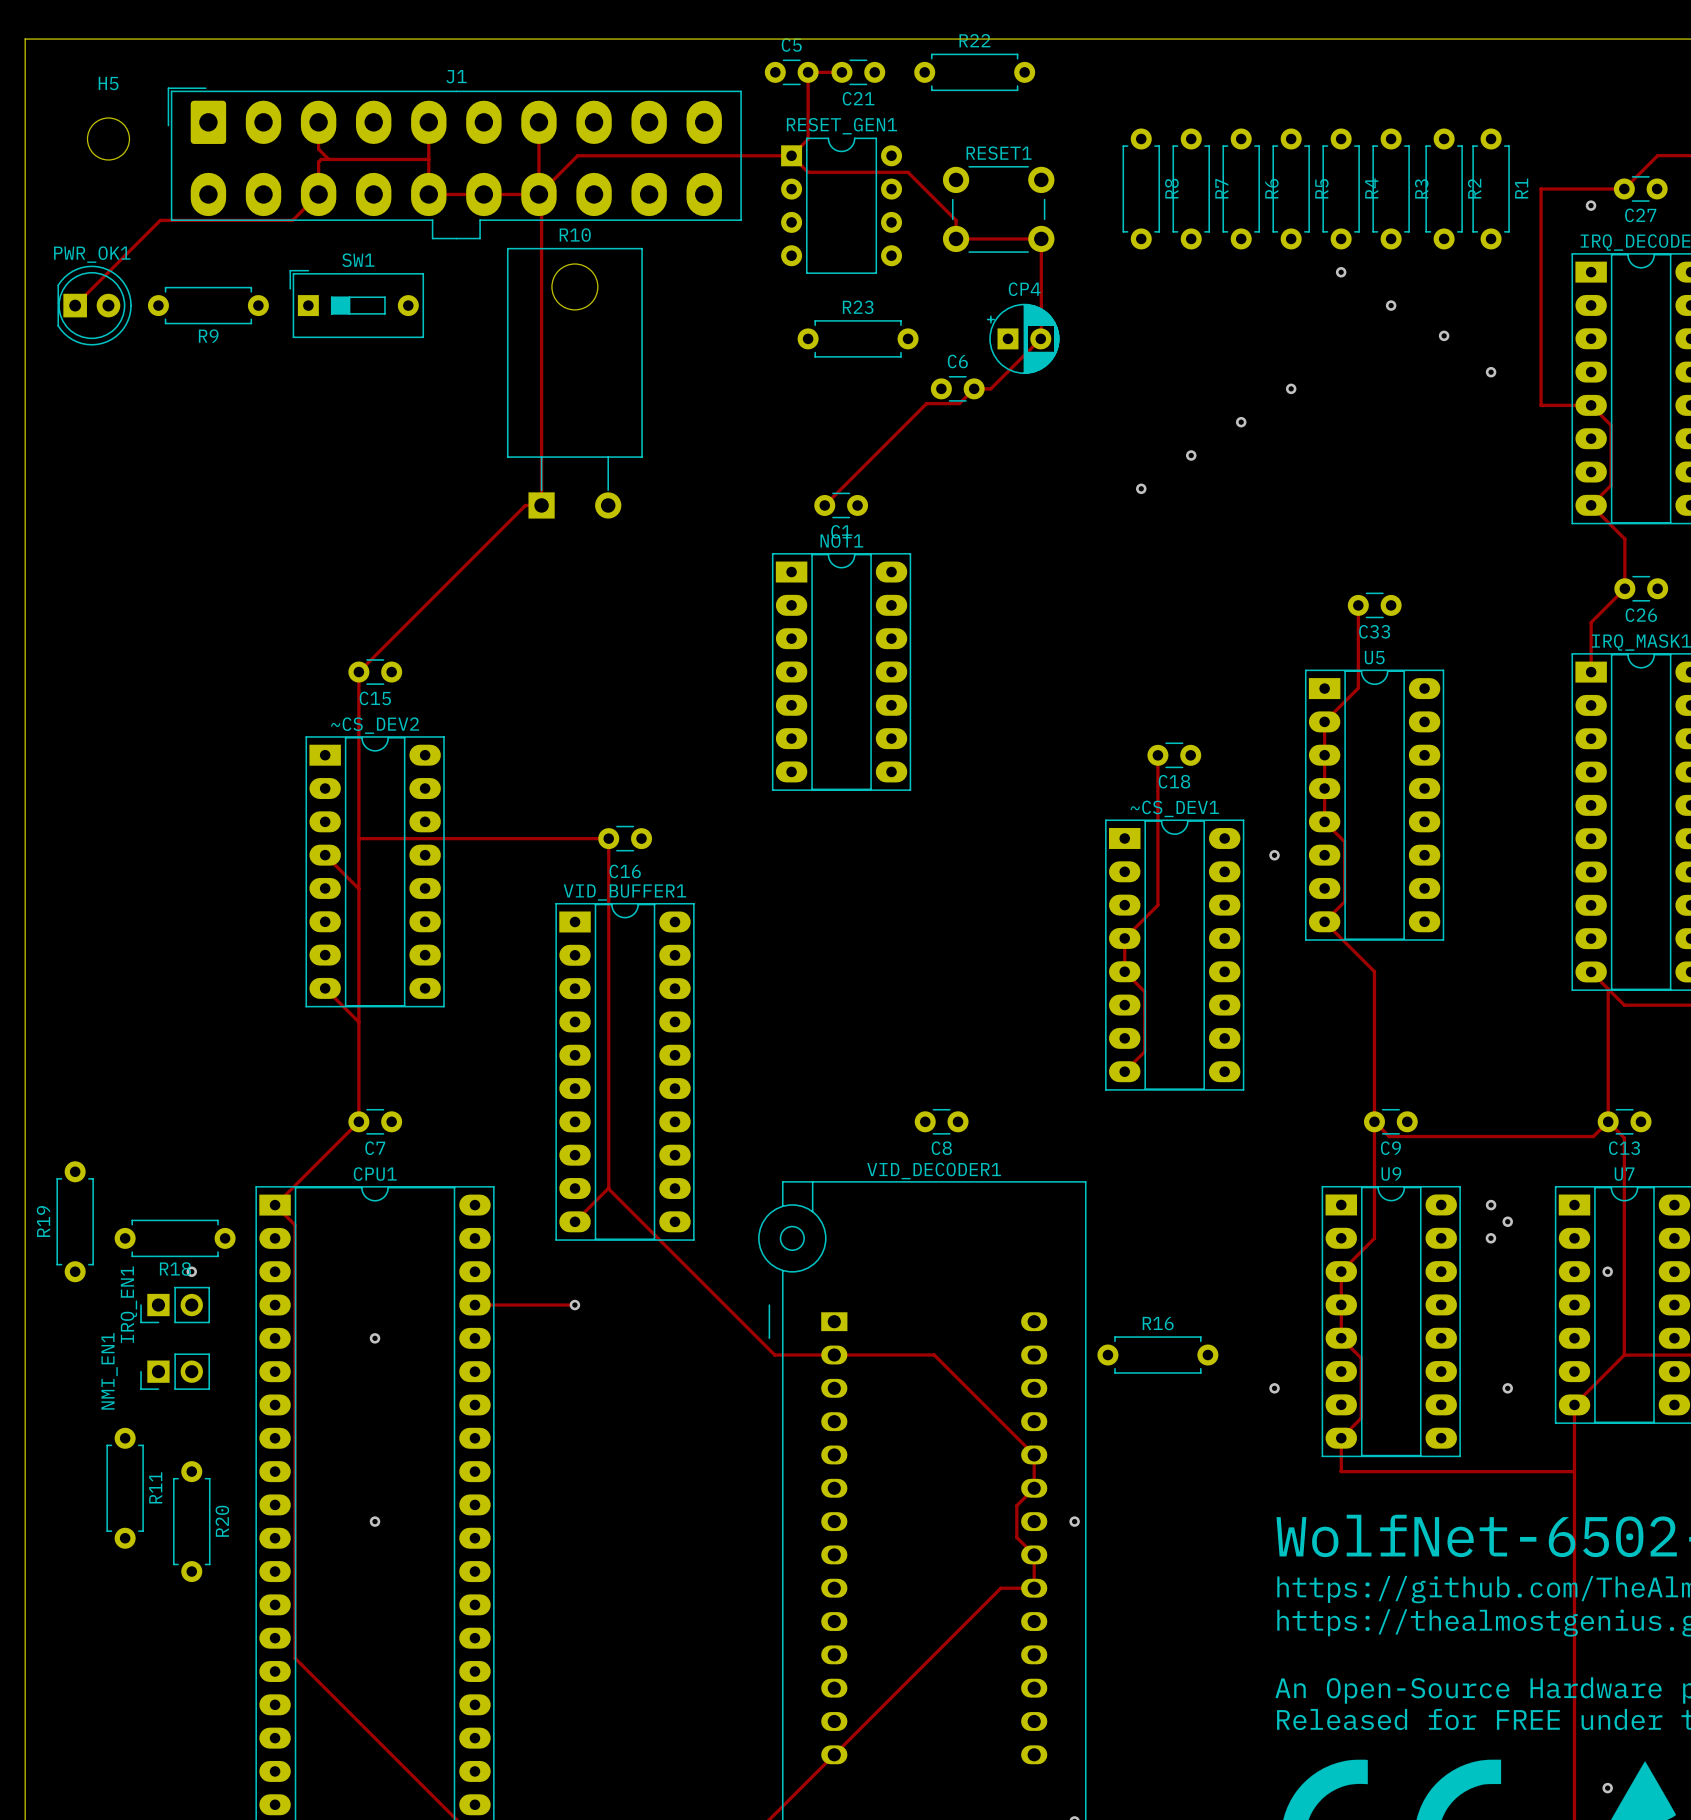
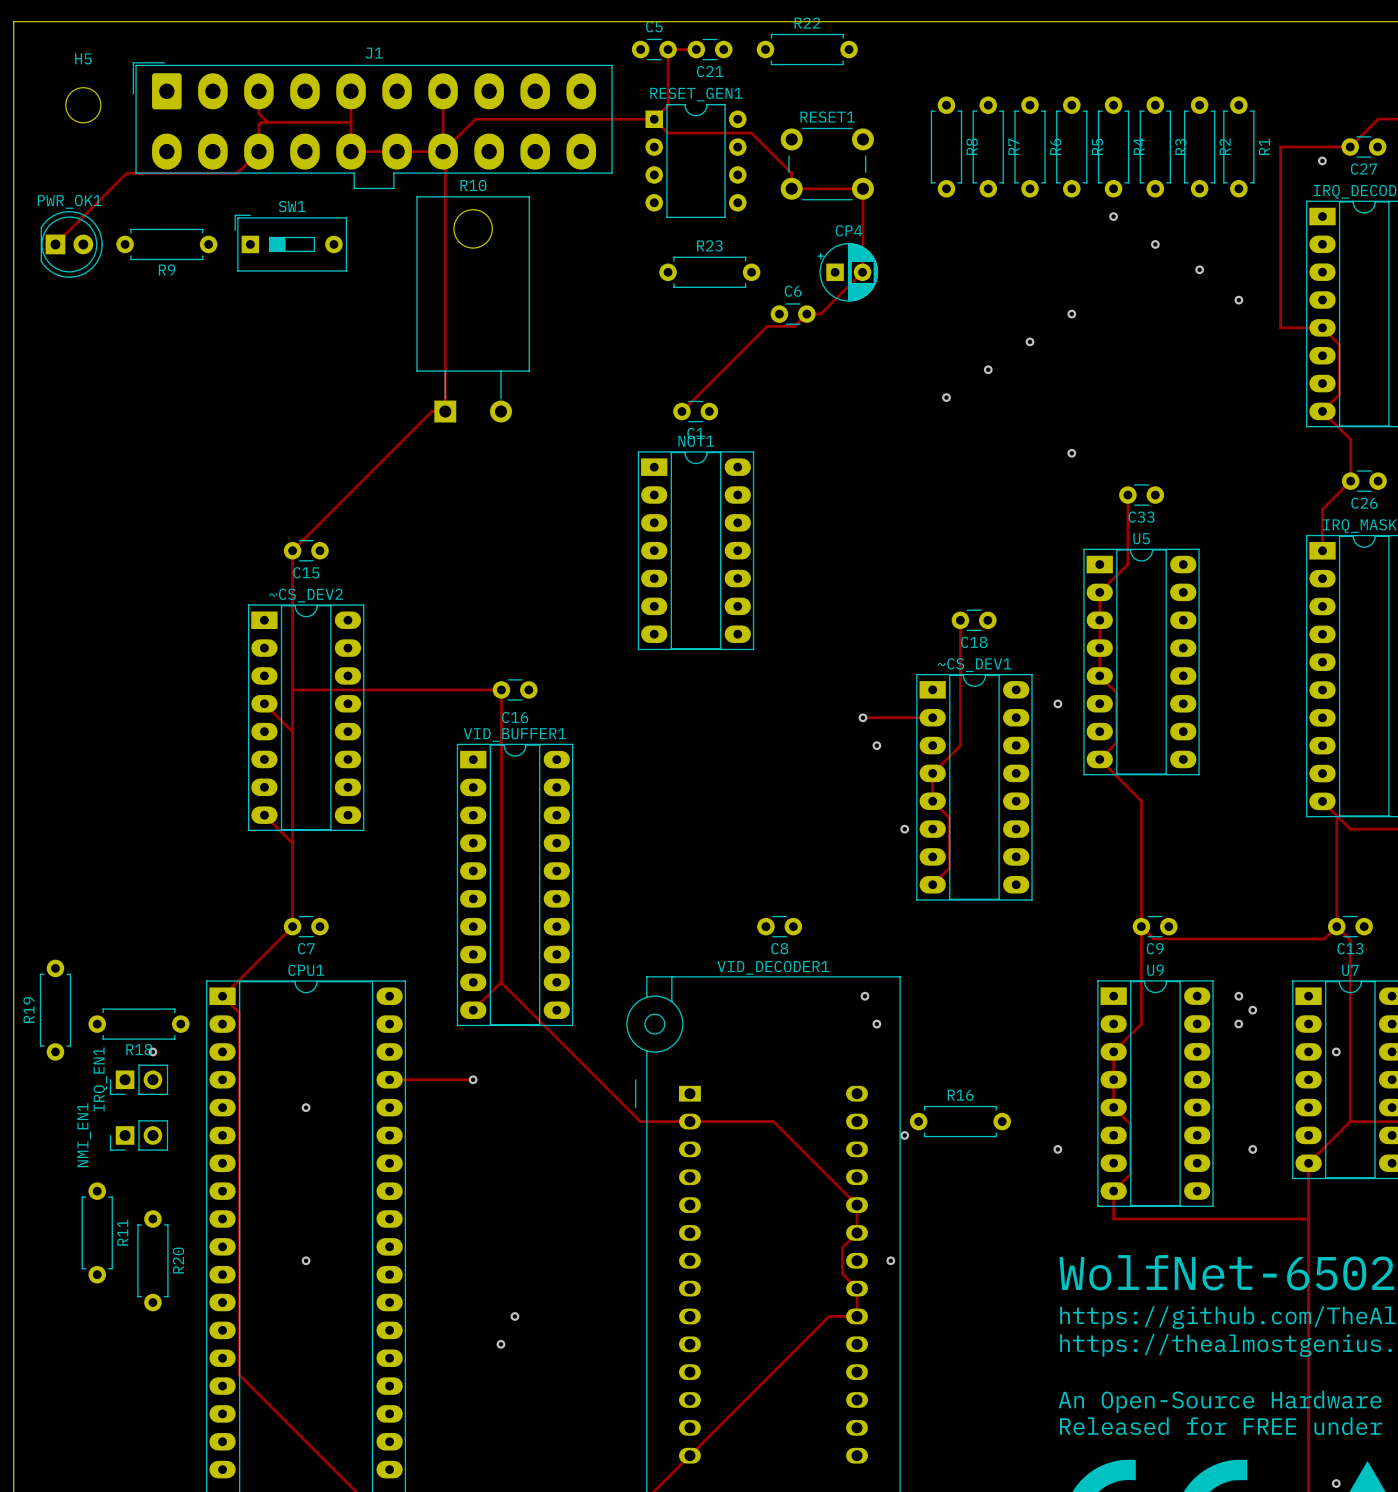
via: none -> (1071, 453)
top track: none -> (863, 717) (932, 717)
via: none -> (862, 717)
via: none -> (876, 745)
via: none -> (904, 829)
via: none -> (864, 996)
via: none -> (876, 1024)
via: none -> (904, 1135)
via: none -> (514, 1316)
via: none -> (500, 1344)

